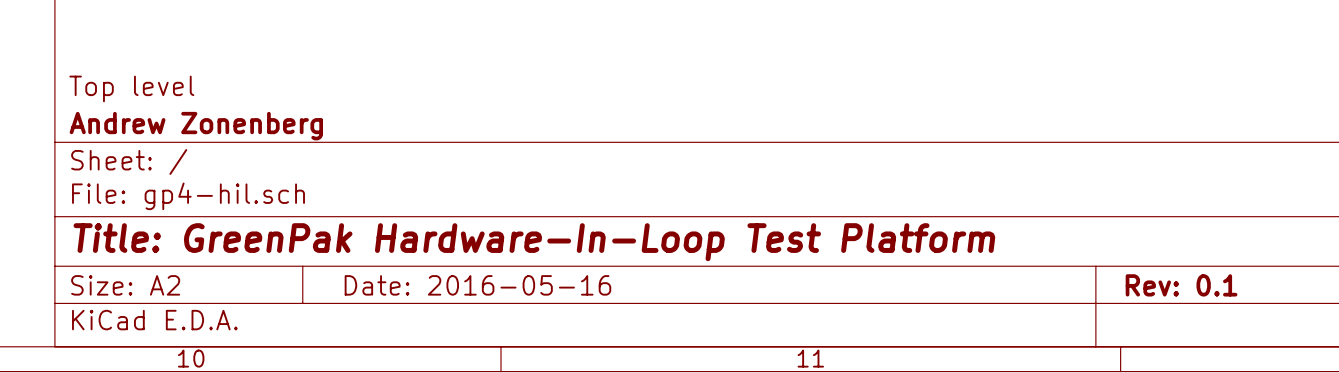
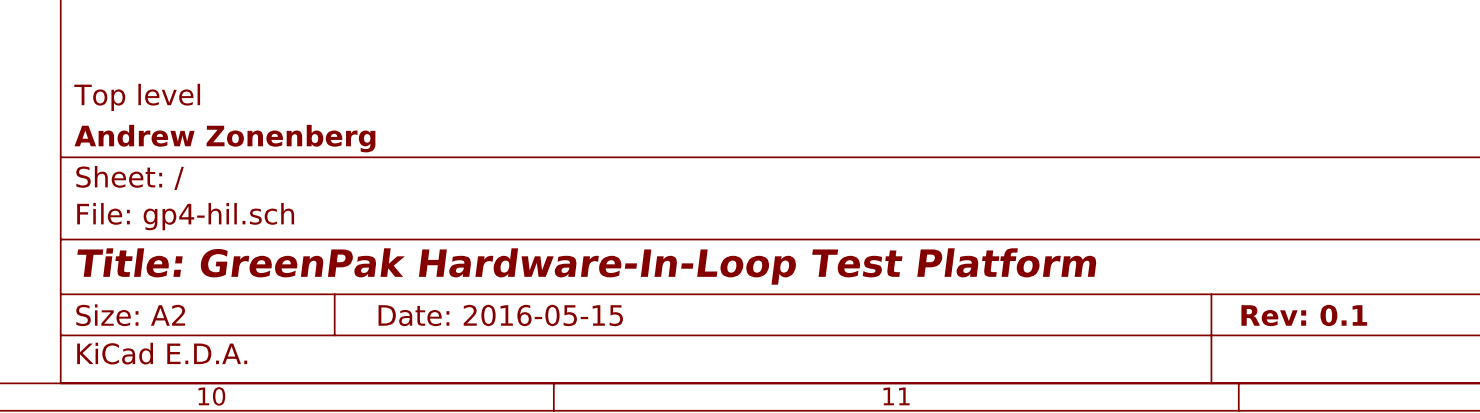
title block: Date: 2016-05-16 (477, 285) -> Date: 2016-05-15 (500, 315)

